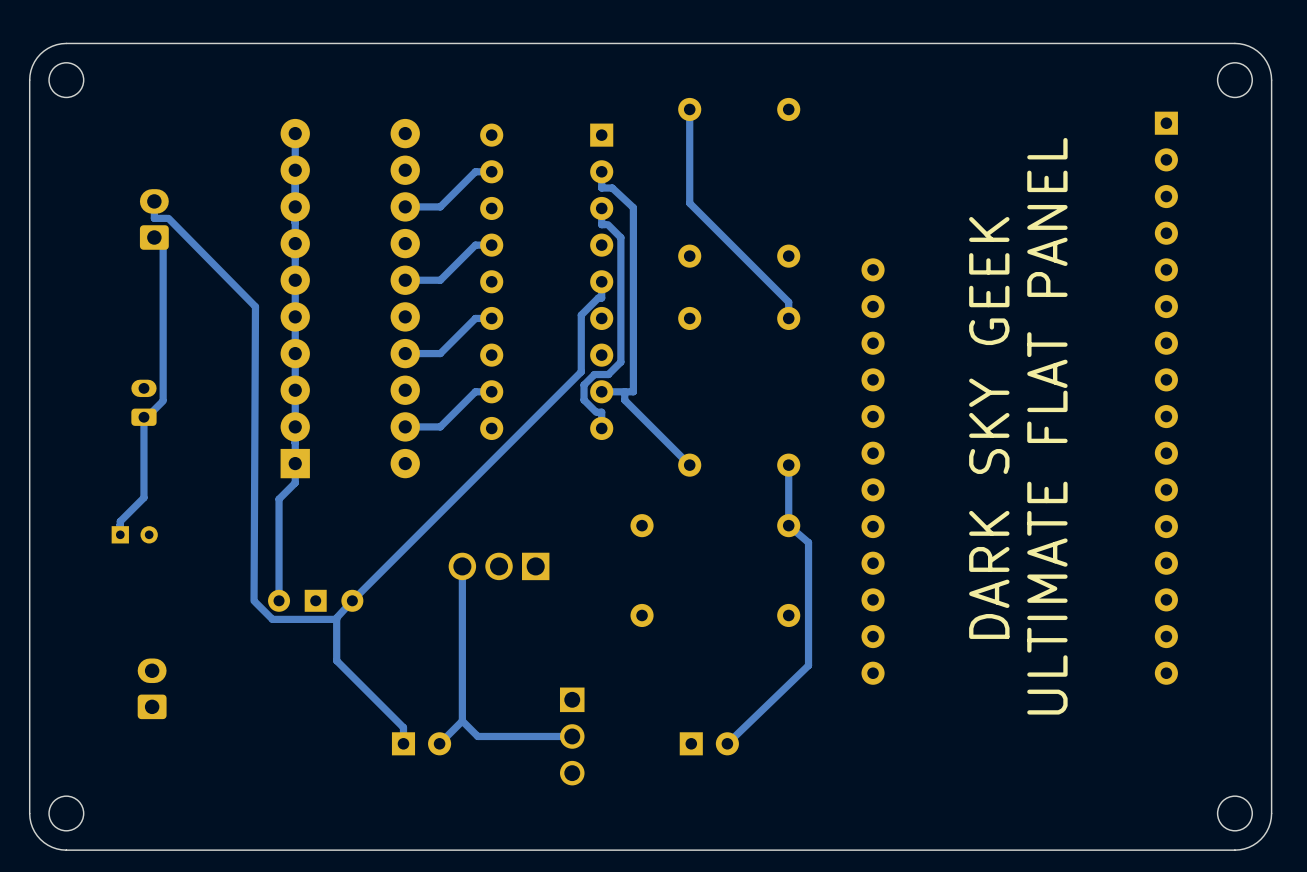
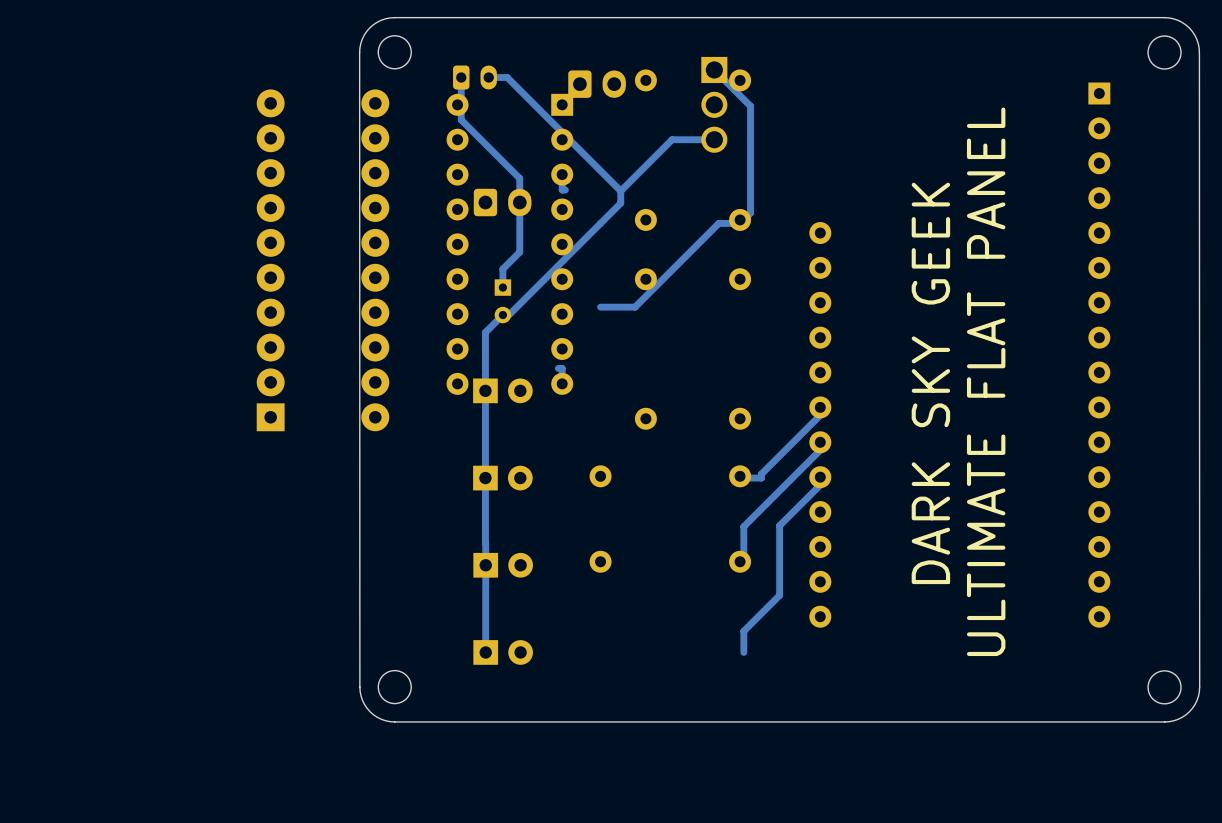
board edge: (425, 43) (66, 43) (56, 44) (44, 51) (32, 66) (29, 80) (29, 813) (30, 822) (37, 835) (52, 847) (66, 850) (1234, 850) (1253, 845) (1266, 831) (1271, 813) (1271, 80) -> (394, 17) (381, 20) (369, 27) (362, 39) (359, 52) (359, 687) (362, 700) (370, 711) (381, 719) (394, 721) (1164, 721) (1173, 720) (1186, 714) (1195, 704) (1199, 687) (1199, 52)
round board edge position: (66, 80) -> (394, 52)
track: none -> (714, 69) (750, 106) (750, 212) (740, 223) (718, 223) (635, 307) (600, 307)
track: none -> (461, 77) (461, 119) (519, 178) (519, 252) (502, 269) (502, 287)
part: none -> (474, 77)
track: none -> (488, 77) (507, 77) (620, 191)
track: (689, 109) (689, 203) (788, 302) (788, 318) -> none
part: none -> (597, 84)
track: (295, 133) (295, 482) (279, 499) (279, 600) -> none
part: none -> (714, 104)
track: (491, 171) (475, 171) (440, 206) (405, 206) -> none
track: (601, 171) (601, 188) (612, 188) (633, 207) (633, 391) (601, 391) -> none
track: none -> (714, 139) (672, 139) (620, 191)
track: (154, 201) (154, 218) (167, 218) -> none
track: (168, 218) (255, 306) -> none
part: (154, 219) -> none
track: (607, 224) (620, 237) (620, 362) (608, 374) (594, 374) (584, 384) (584, 400) (596, 412) -> none
track: none -> (620, 191) (620, 203) (508, 315) (502, 315) (485, 332) (485, 652)
part: none -> (502, 202)
track: (163, 244) (163, 399) -> none
track: (491, 245) (475, 245) (440, 280) (405, 280) -> none
track: (601, 281) (601, 298) (598, 298) (581, 315) (581, 371) (336, 617) (336, 660) (403, 727) (403, 743) -> none
track: (255, 306) (254, 600) -> none
track: (491, 318) (475, 318) (440, 353) (405, 353) -> none
part: none -> (502, 301)
track: (491, 391) (475, 391) (440, 426) (405, 426) -> none
track: (624, 391) (624, 400) (689, 465) -> none
track: (163, 400) (146, 417) (143, 417) (143, 497) (120, 521) (120, 534) -> none
part: (143, 402) -> none
part: none -> (502, 390)
track: none -> (823, 411) (761, 474) (761, 478) (740, 478)
track: (788, 465) (788, 525) (808, 542) (808, 665) (727, 743) -> none
track: none -> (823, 446) (743, 526) (743, 565)
part: none -> (502, 478)
track: none -> (823, 481) (779, 525) (779, 595) (743, 631) (743, 652)
part: (134, 534) -> none
track: (462, 566) (462, 721) -> none
part: (499, 566) -> none
part: (315, 600) -> none
track: (255, 602) (272, 619) (336, 619) -> none
part: none -> (503, 565)
part: (152, 688) -> none
part: none -> (503, 652)
track: (462, 721) (477, 736) (572, 736) -> none
track: (462, 721) (439, 743) -> none
round board edge: none -> [377, 669, 412, 705]
part: (572, 736) -> none
part: (421, 743) -> none
part: (709, 743) -> none
round board edge: [48, 795, 85, 832] -> none
round board edge position: (1234, 813) -> (1164, 687)

